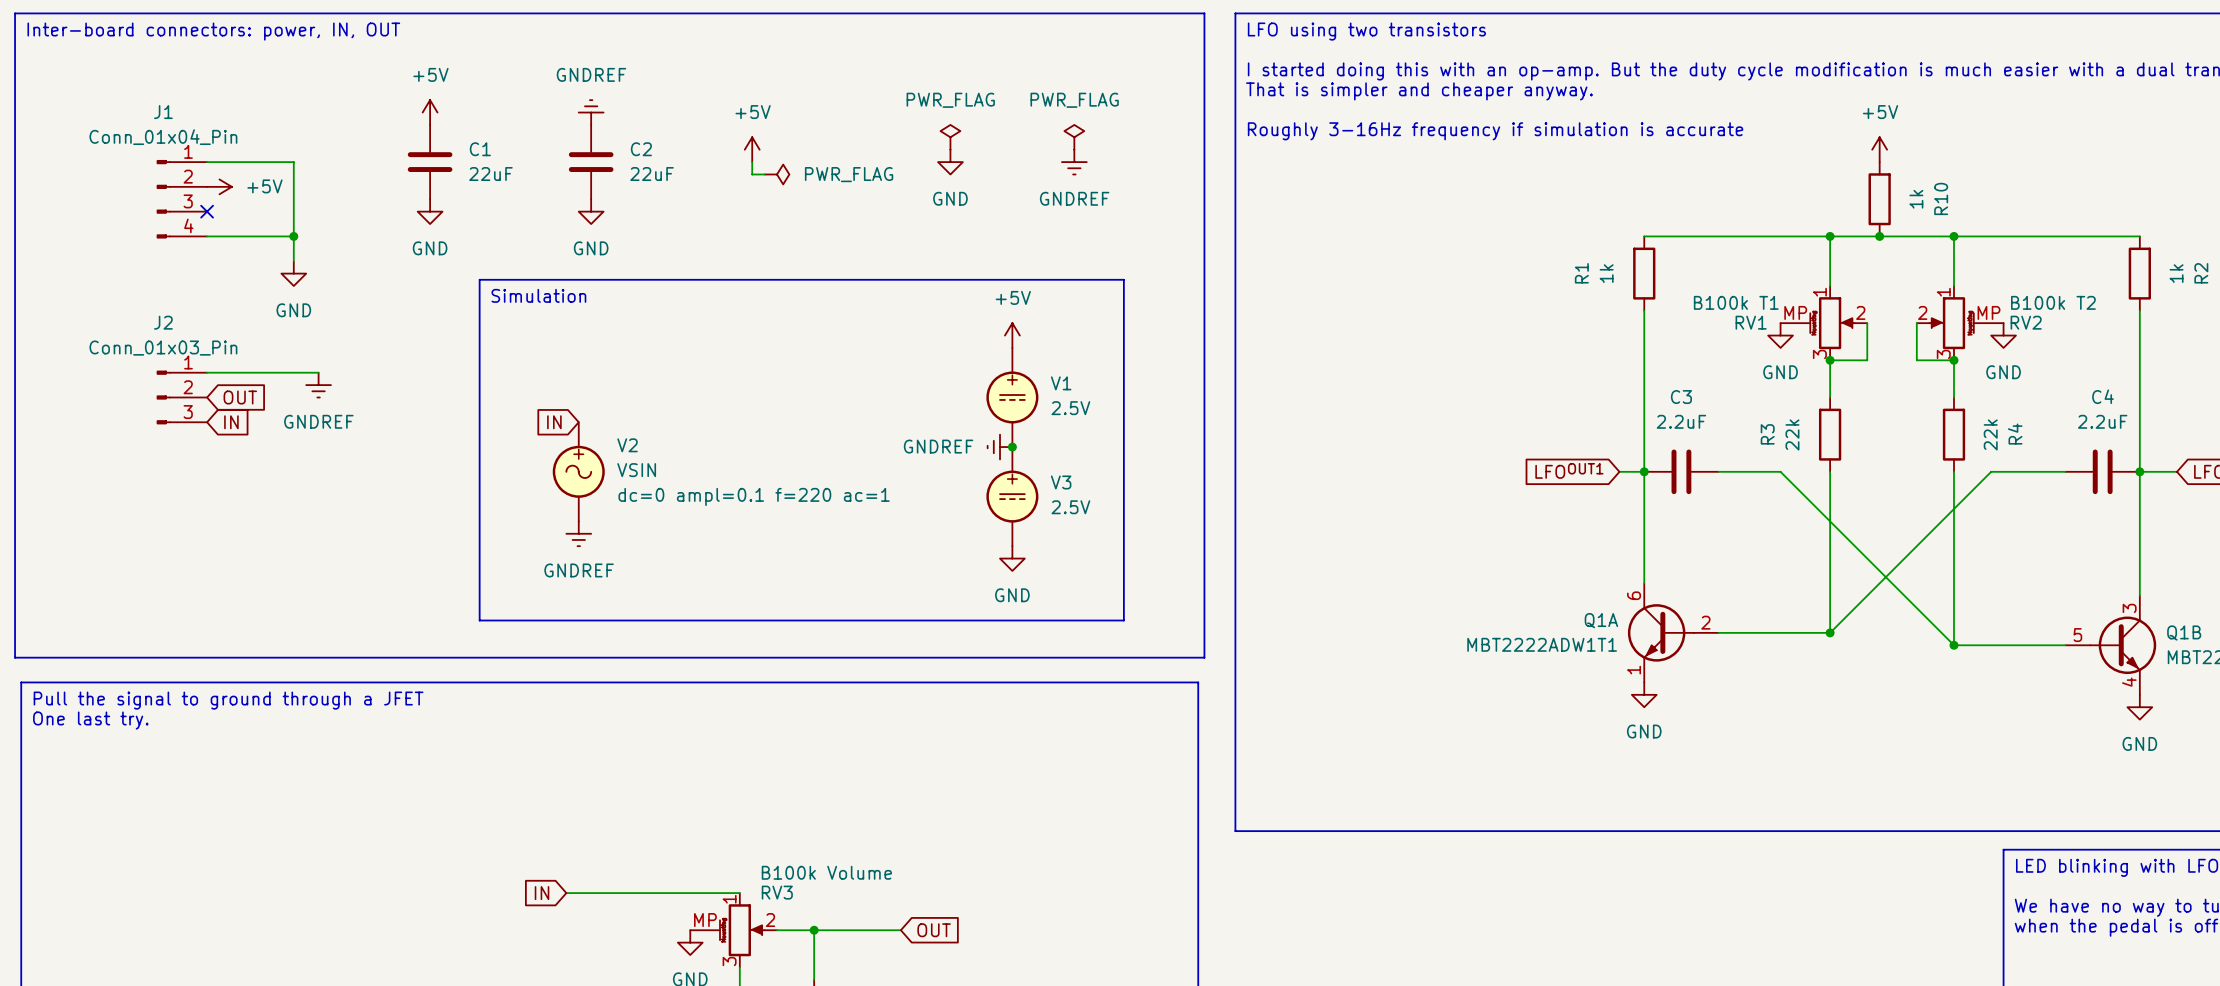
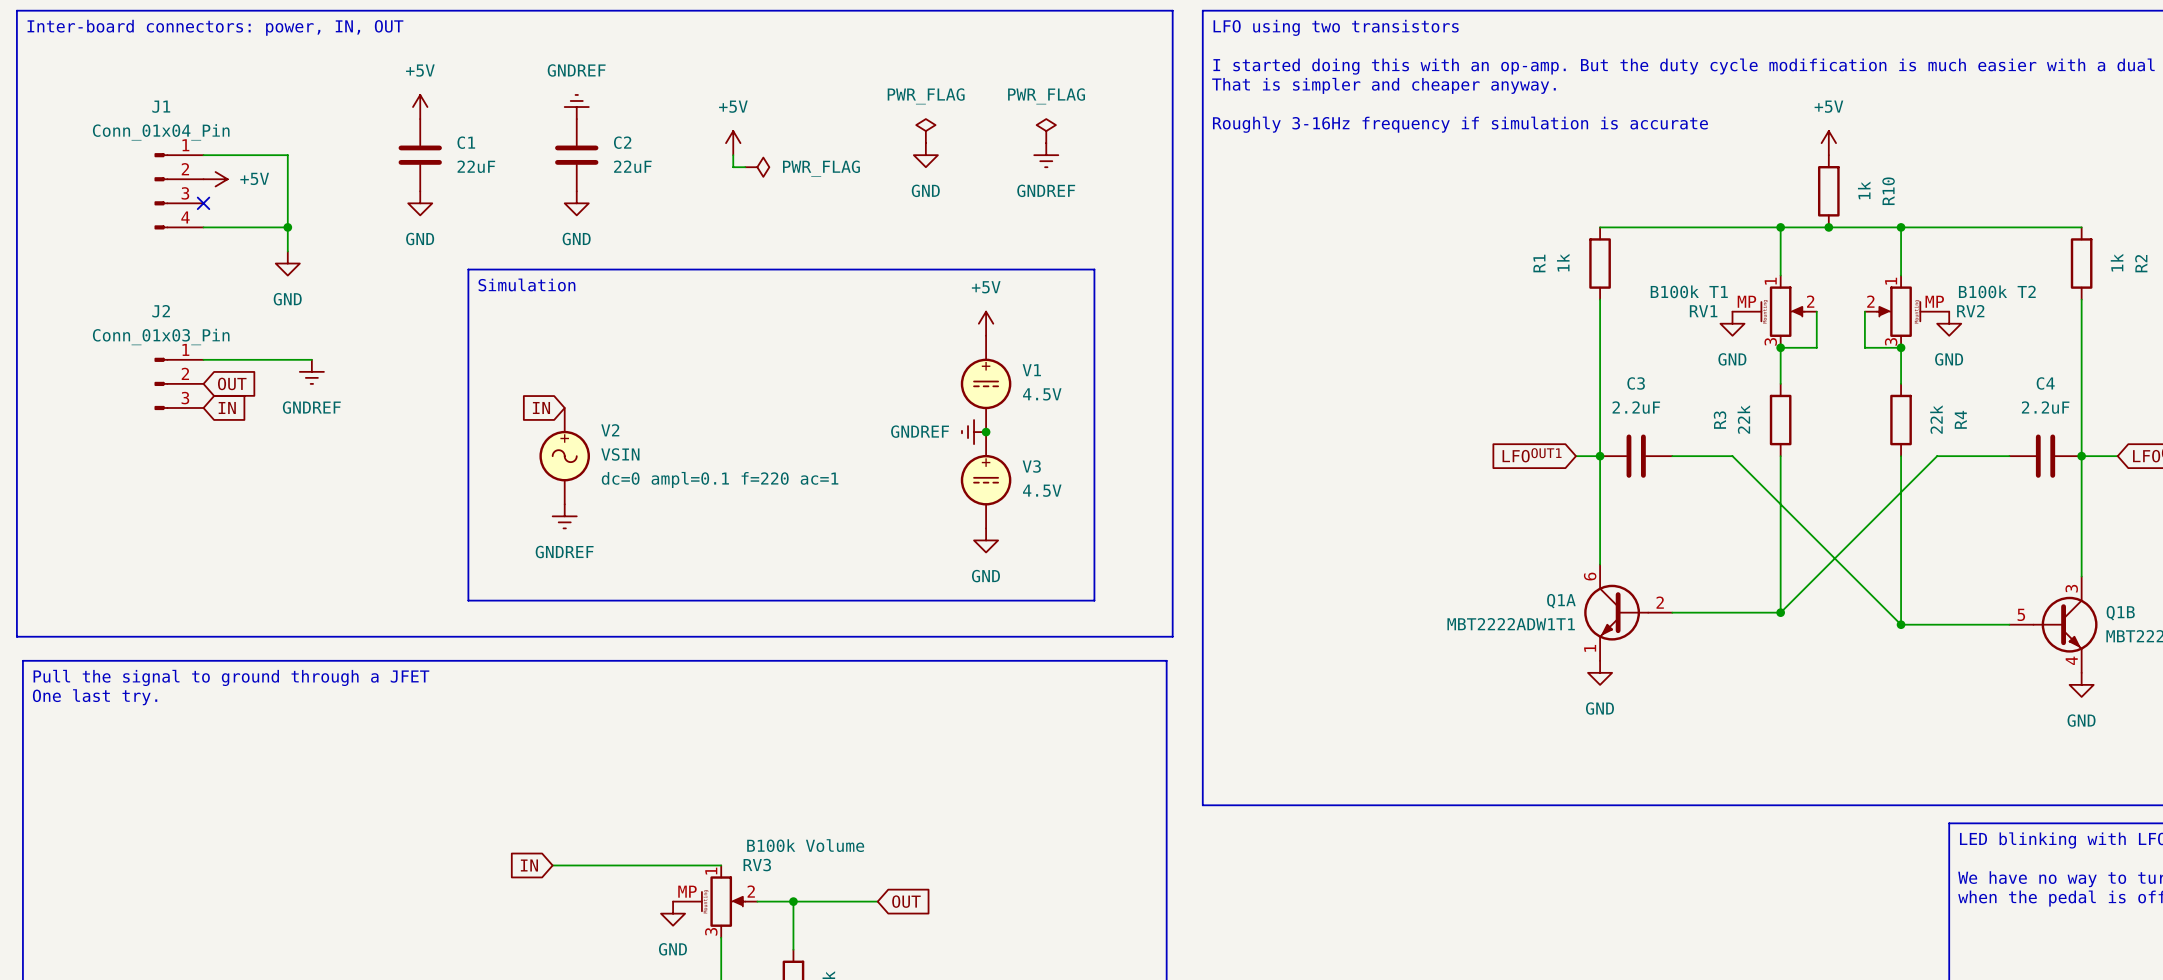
V1 value: 2.5V (1070, 408) -> 4.5V (1042, 394)
V3 value: 2.5V (1070, 507) -> 4.5V (1042, 490)

